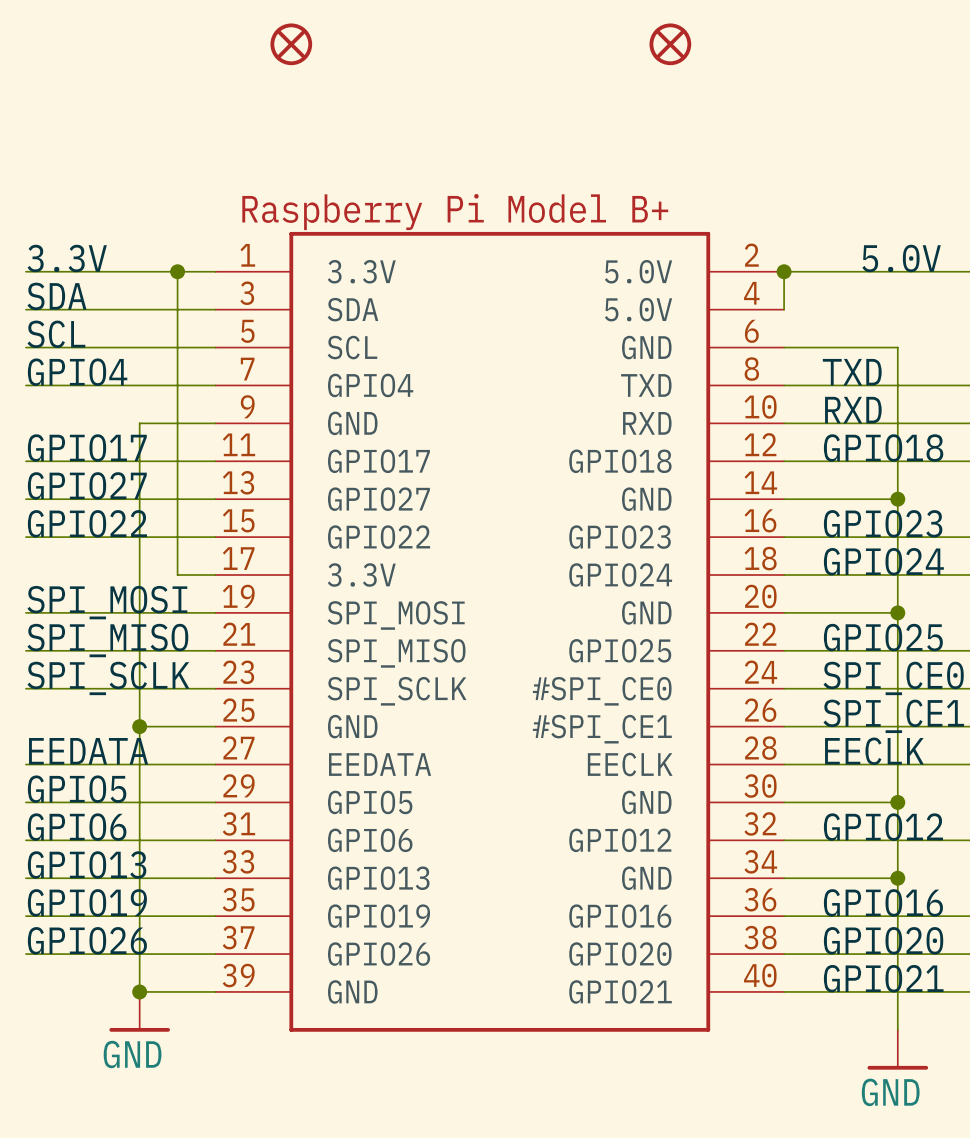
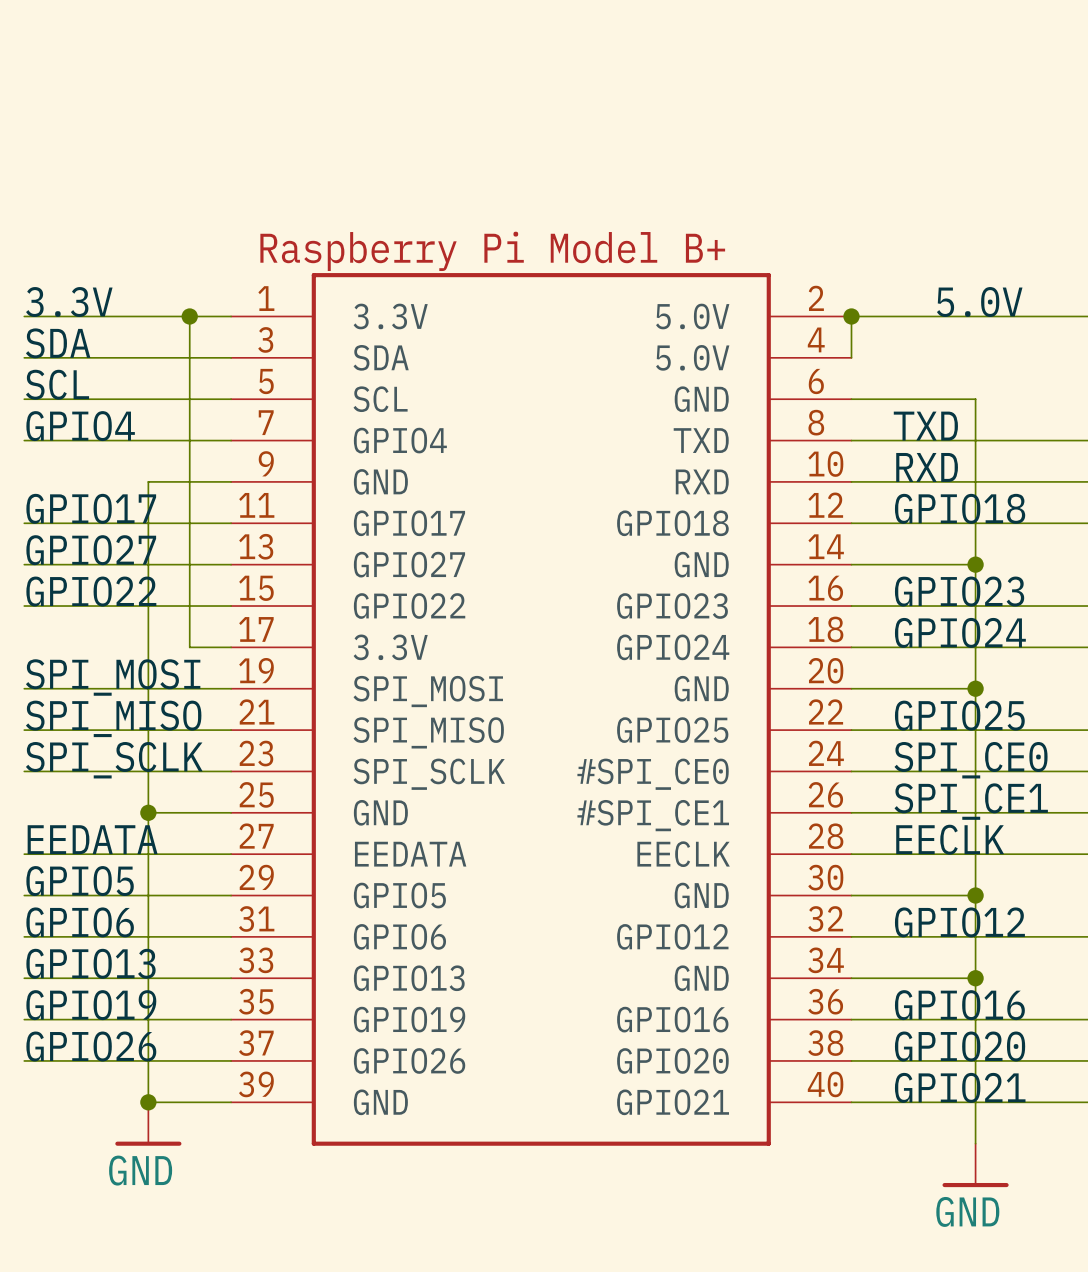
part: (291, 44) -> none
part: (670, 44) -> none

